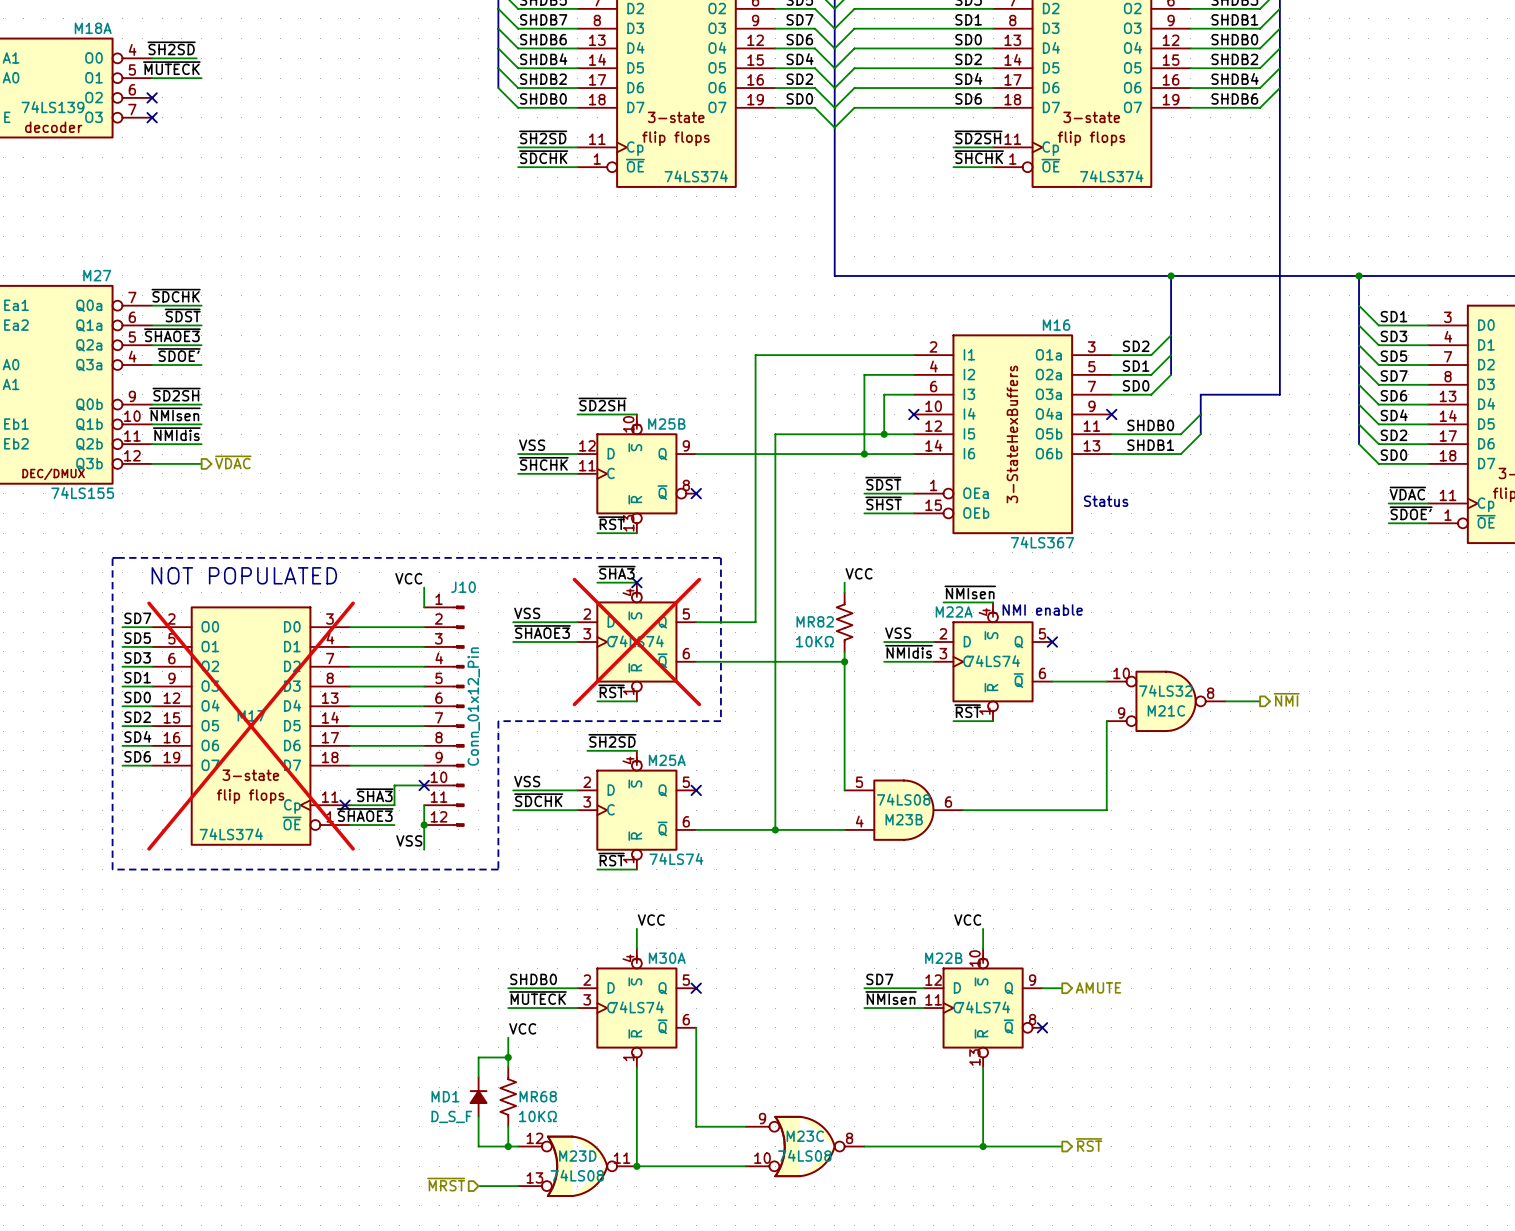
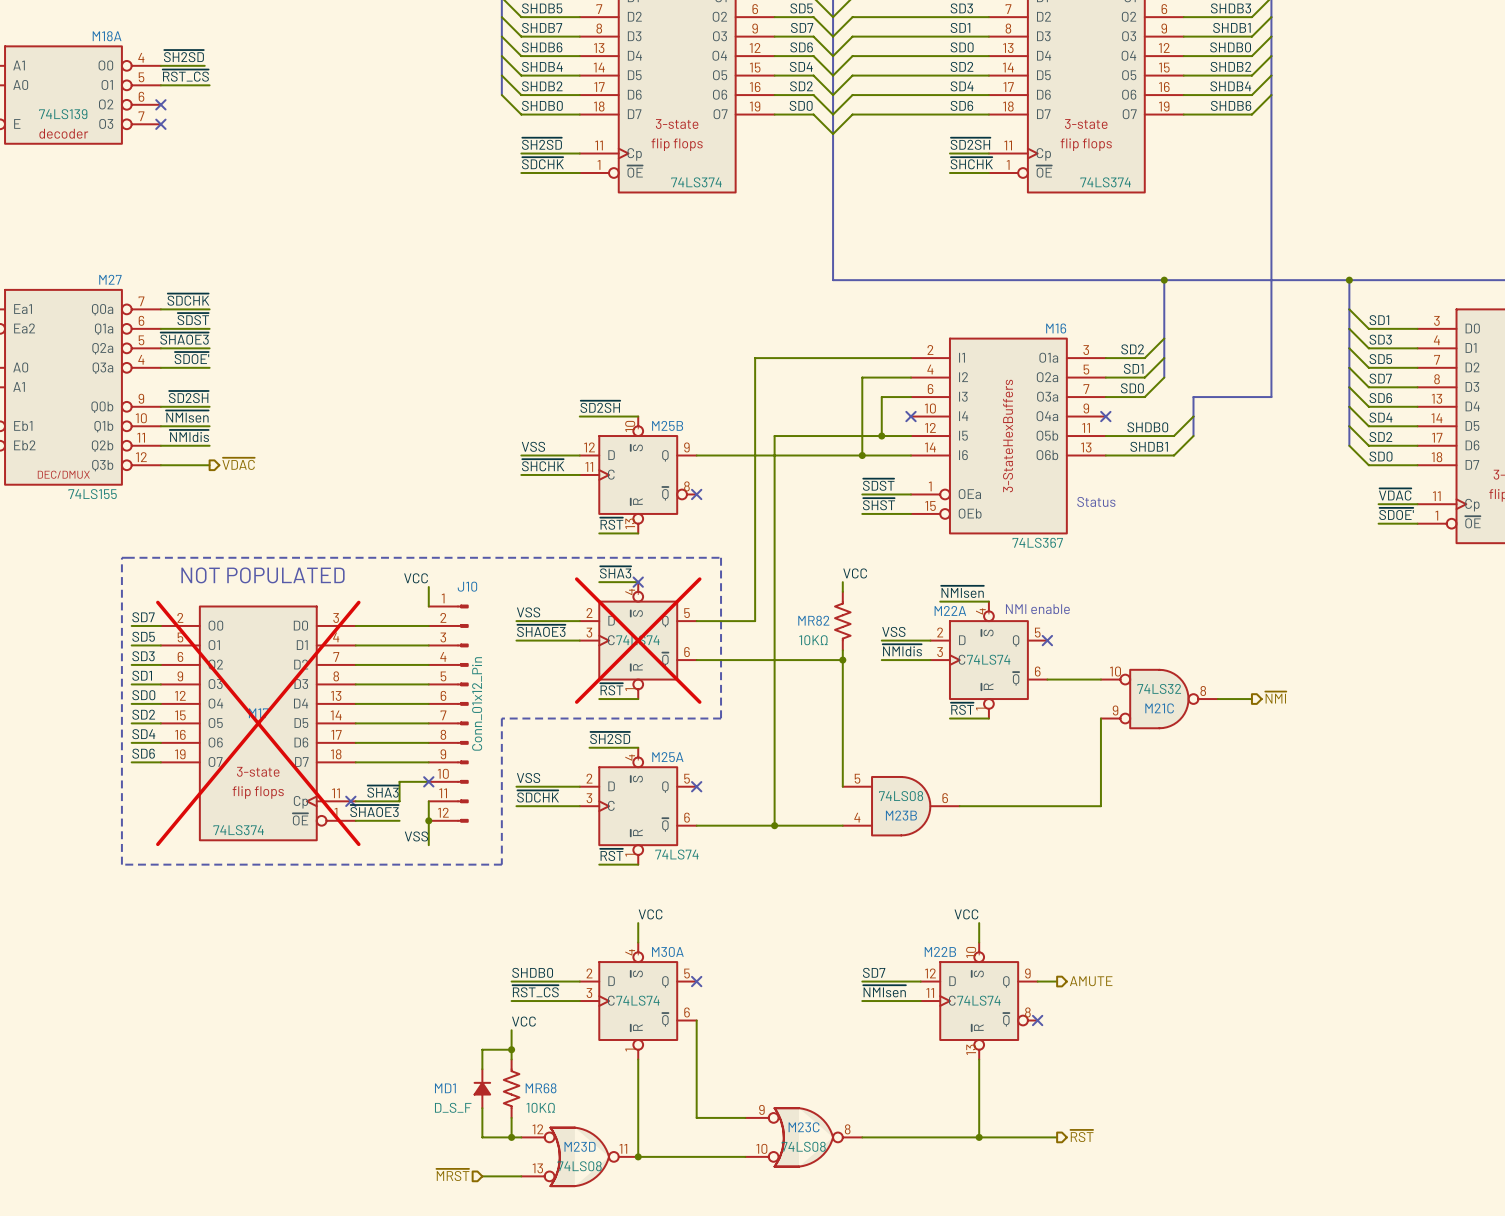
label: ~{MUTECK} (171, 68) -> ~{RST_CS} (185, 75)
label: ~{MUTECK} (538, 998) -> ~{RST_CS} (535, 991)

